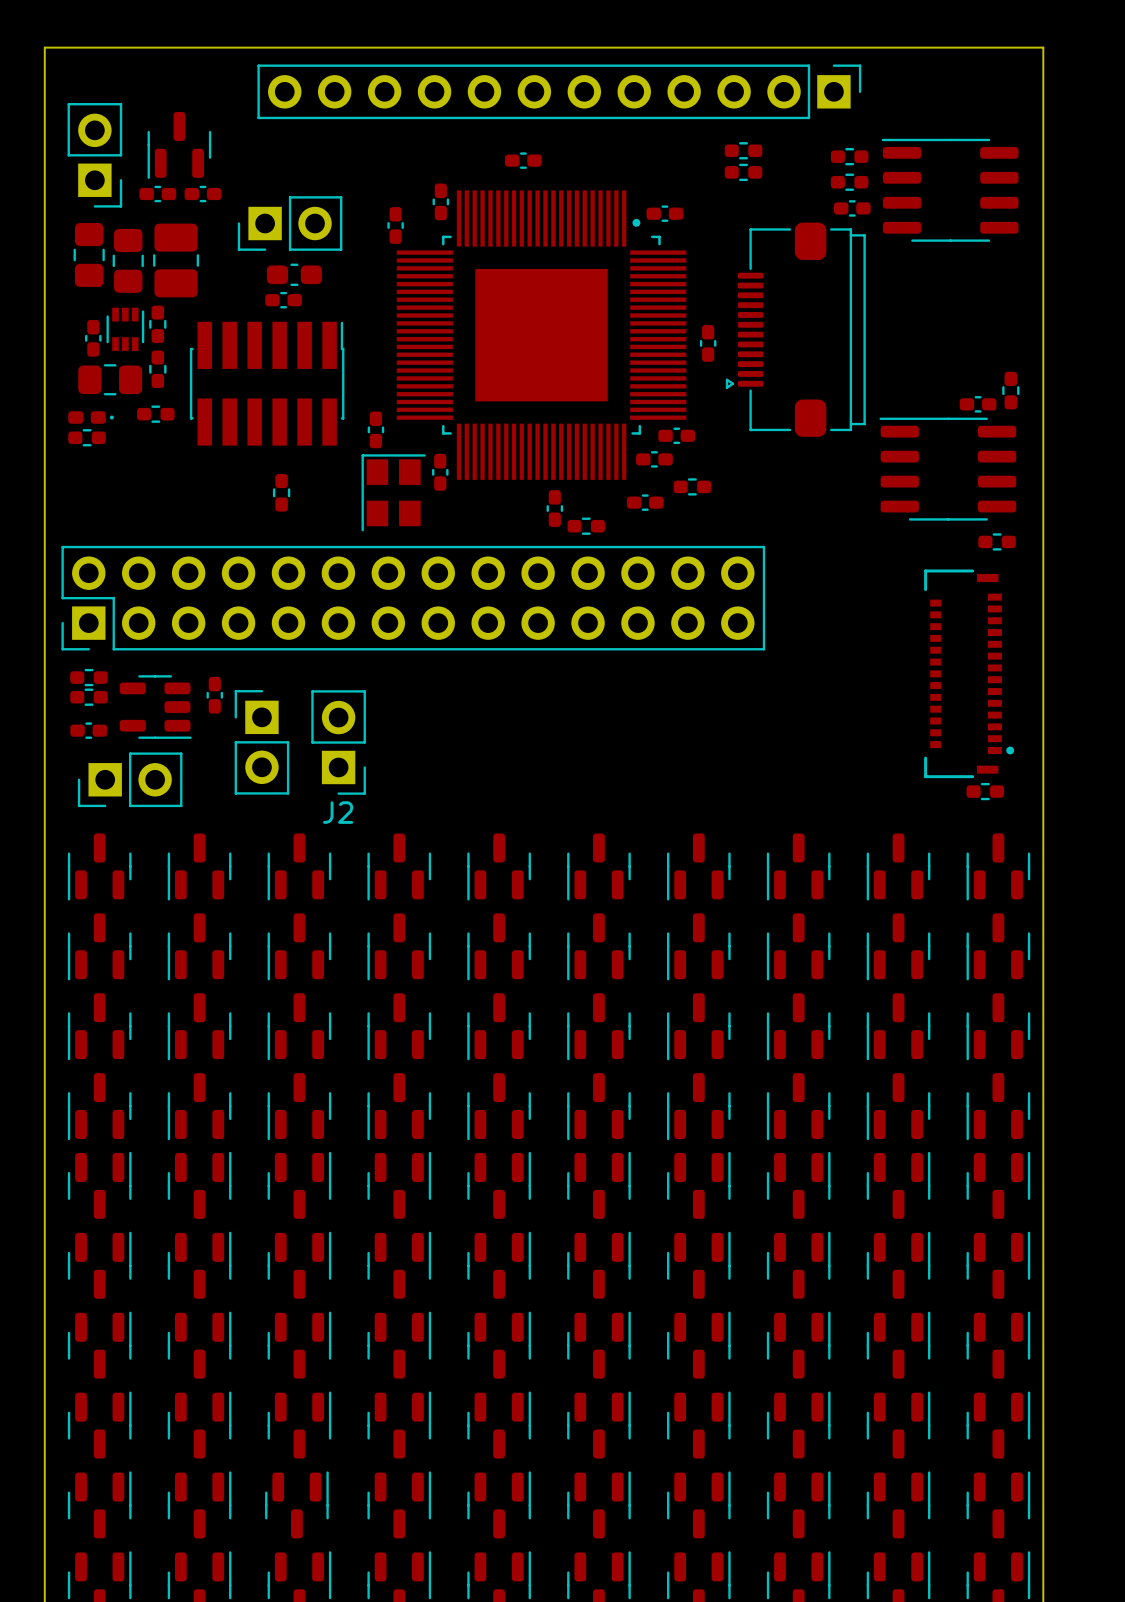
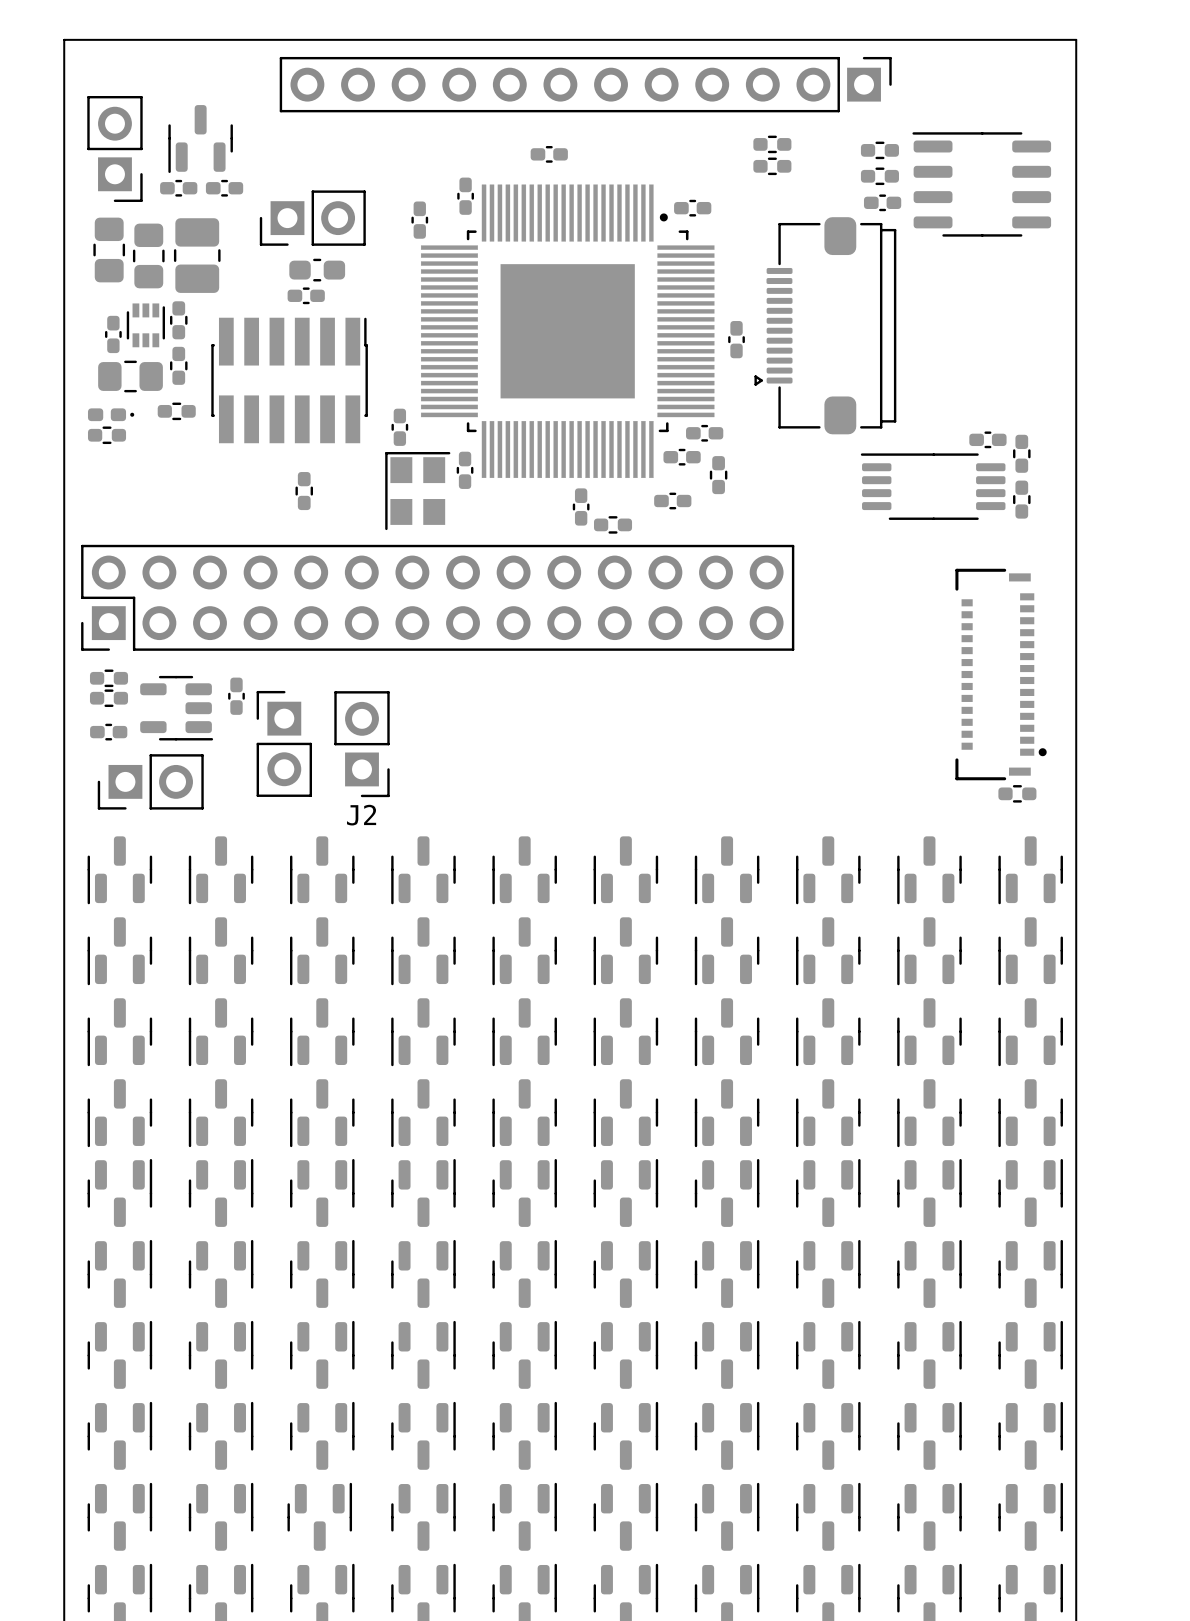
part: (1010, 390) -> none
part position: (978, 404) -> (987, 439)
part: none -> (1021, 453)
part: (947, 469) -> none
part rotation: 0° (692, 486) -> 90° clockwise (718, 475)
part: none -> (933, 486)
part rotation: 0° (997, 541) -> 90° clockwise (1021, 499)
part position: (997, 541) -> (1021, 499)

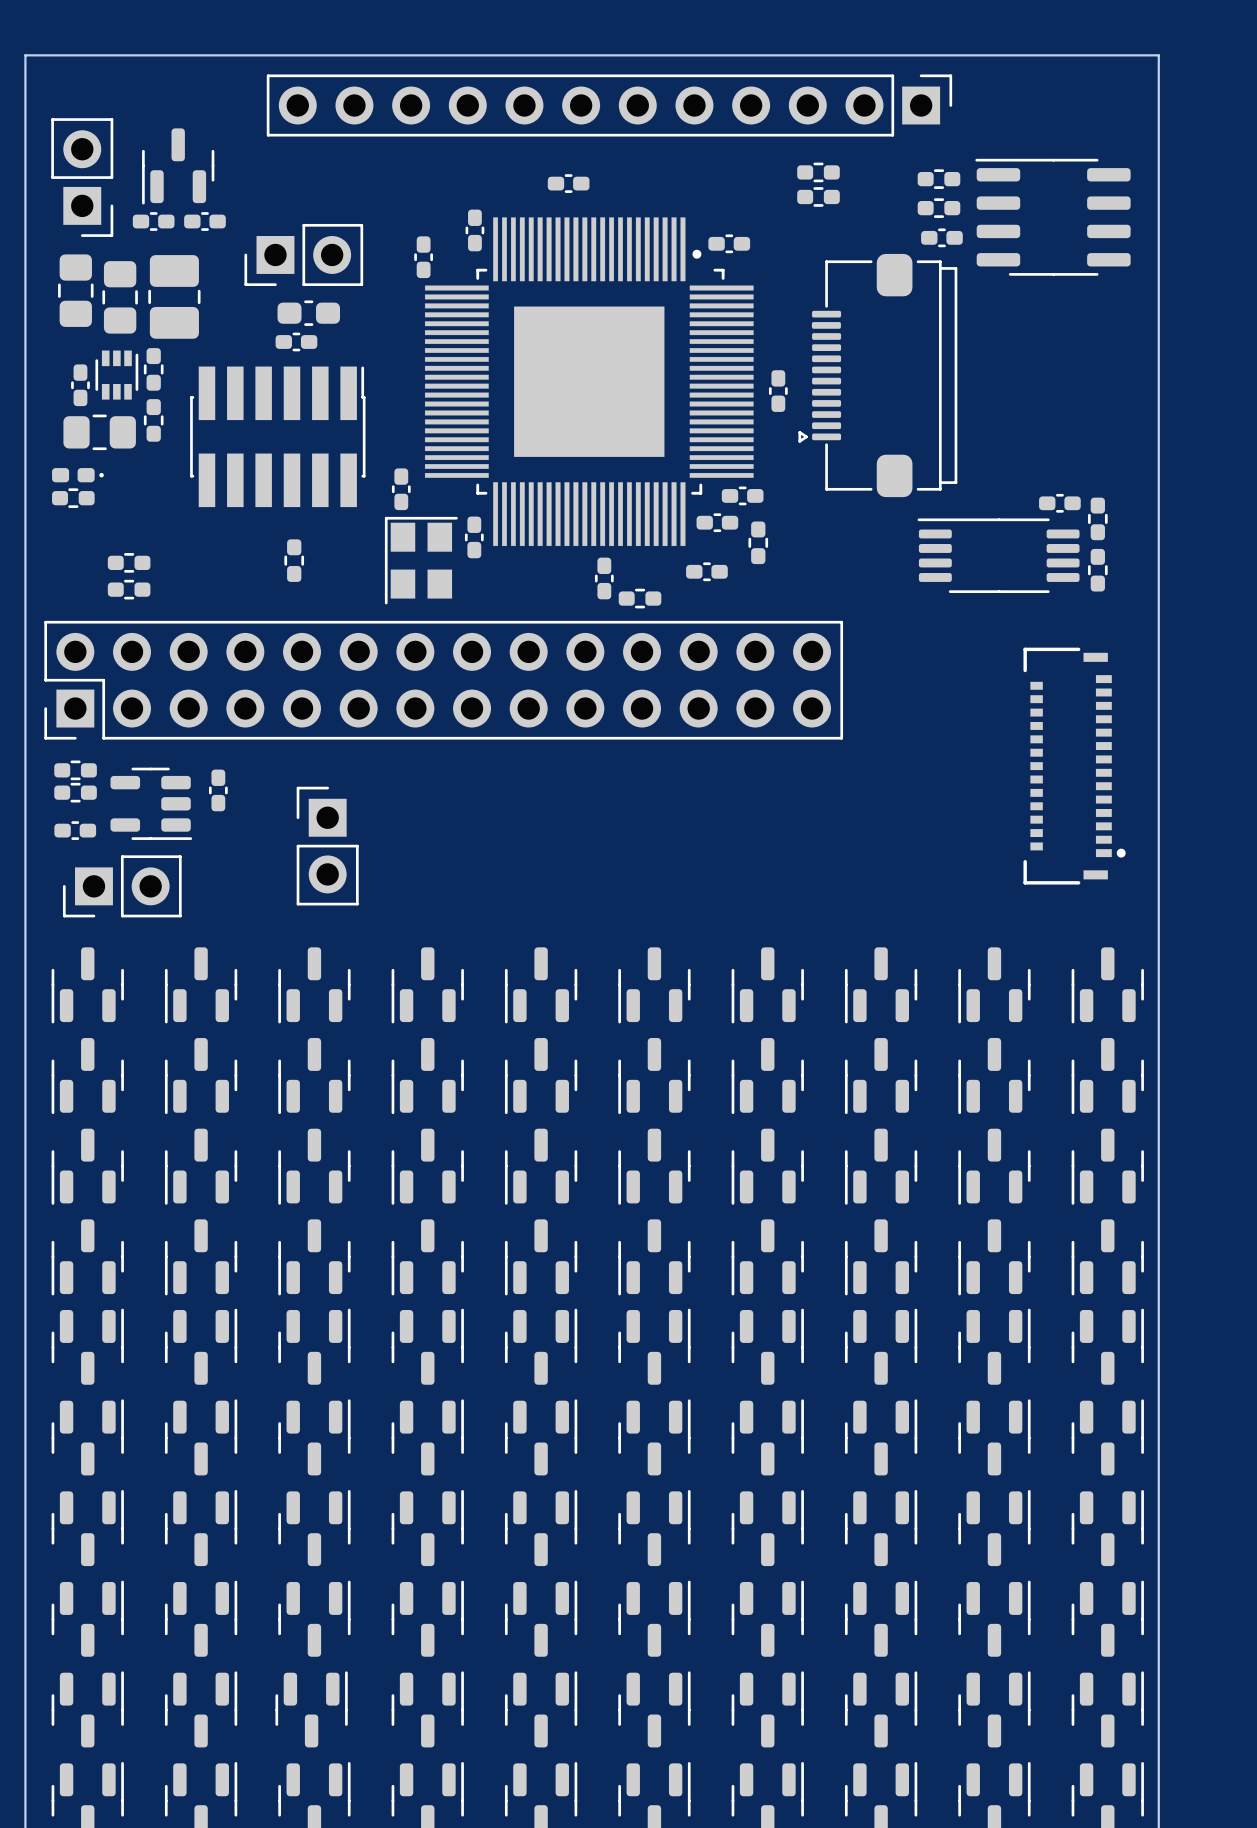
part: (176, 411) -> none
part: none -> (129, 562)
part: none -> (129, 589)
part position: (284, 743) -> (327, 846)
J2: (362, 744) -> none
part: (1017, 793) -> none

